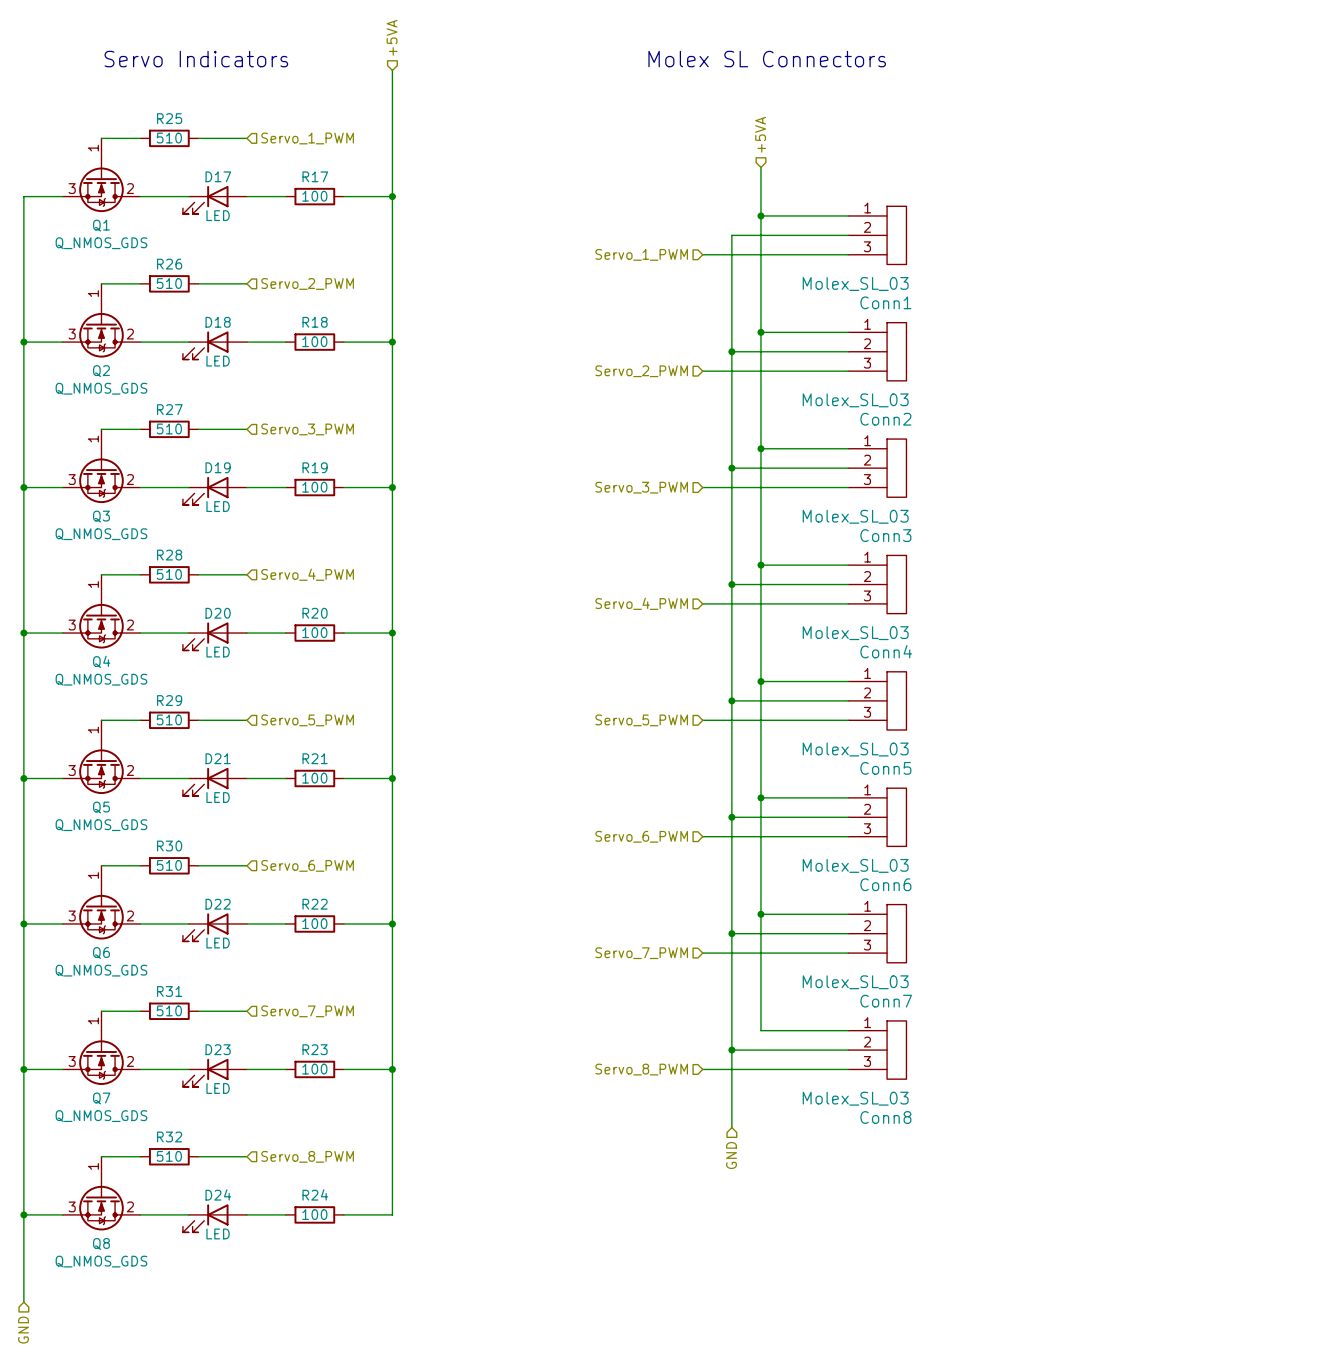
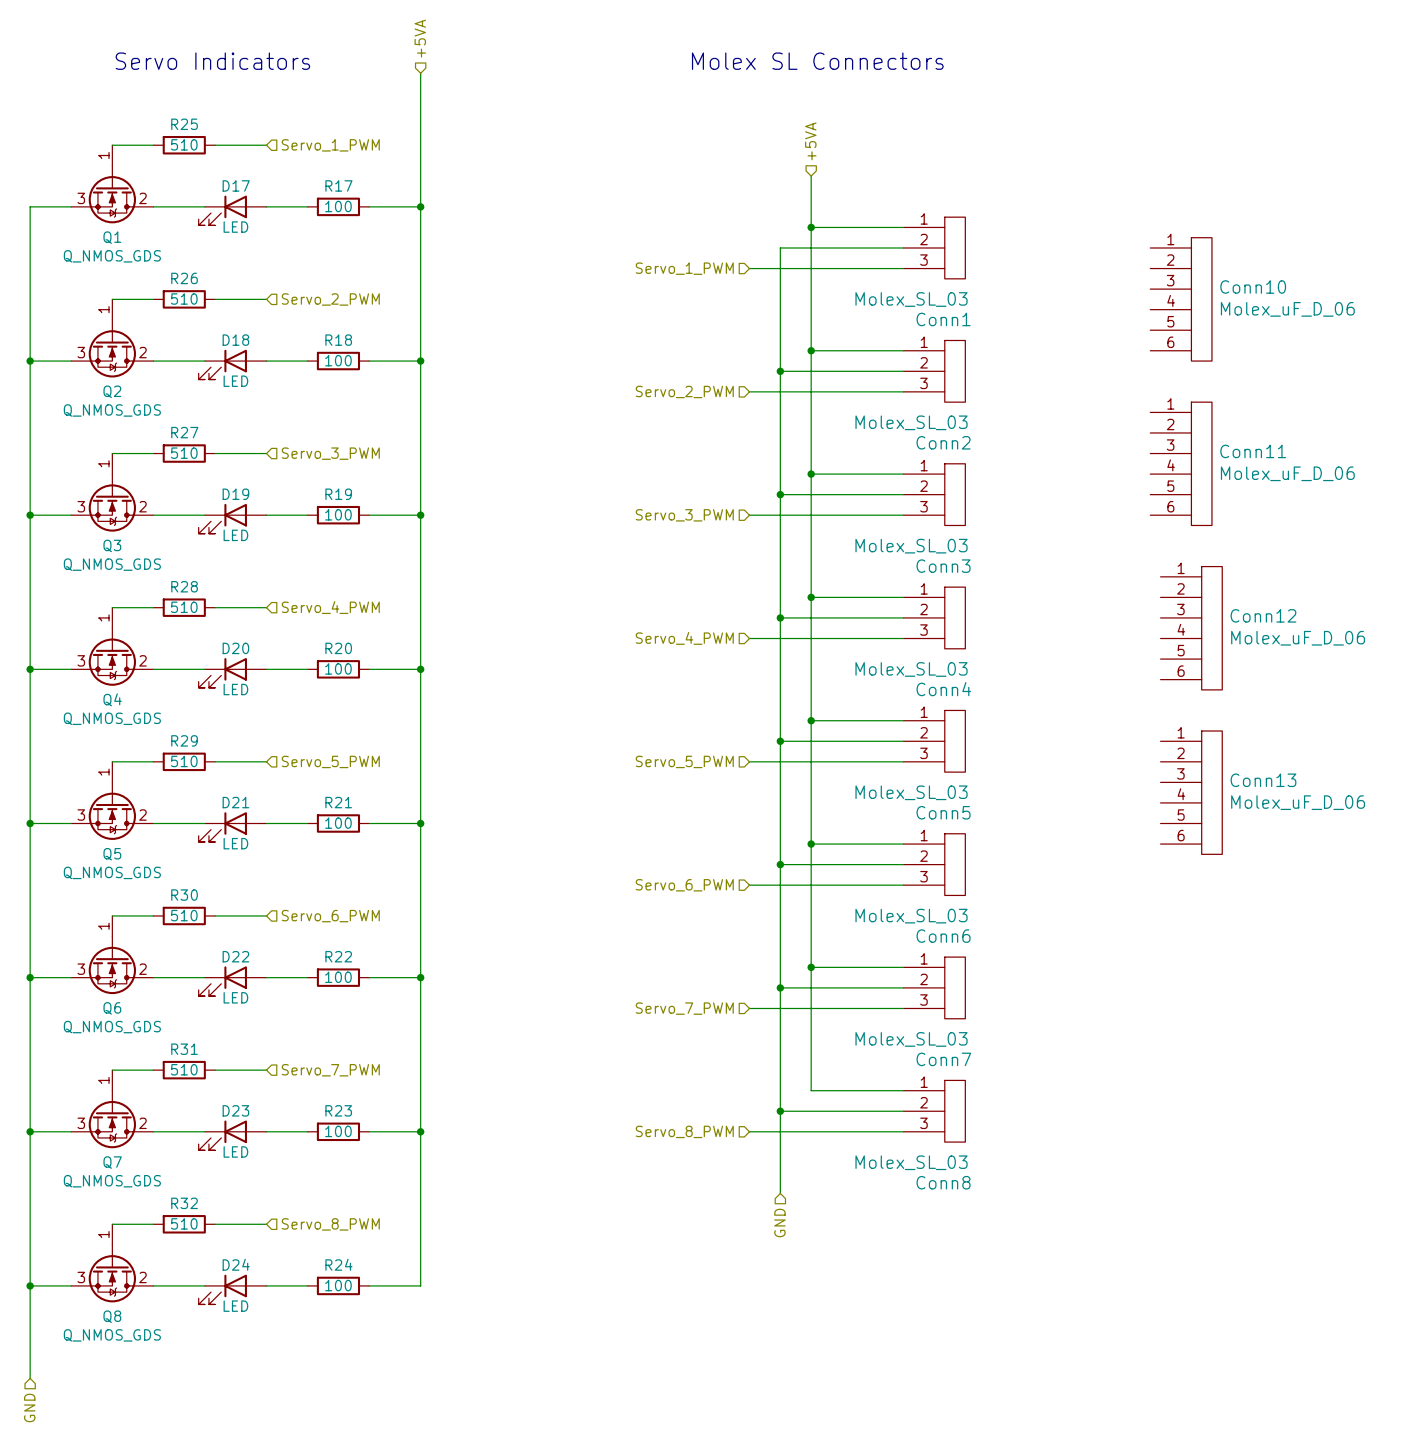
Conn10: none -> Molex_uF_D_06 (1181, 299)
Conn11: none -> Molex_uF_D_06 (1181, 463)
Conn12: none -> Molex_uF_D_06 (1191, 628)
Conn13: none -> Molex_uF_D_06 (1191, 792)

